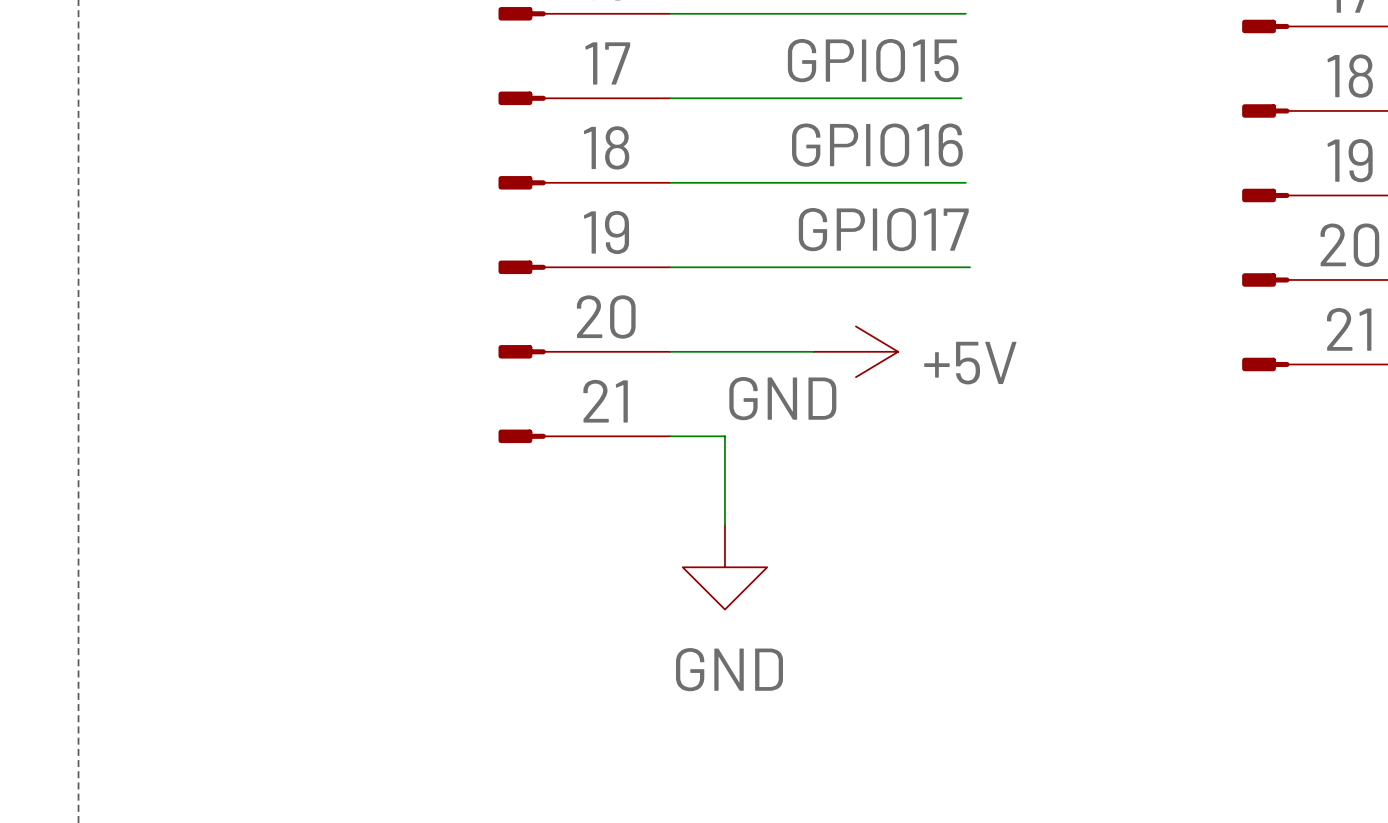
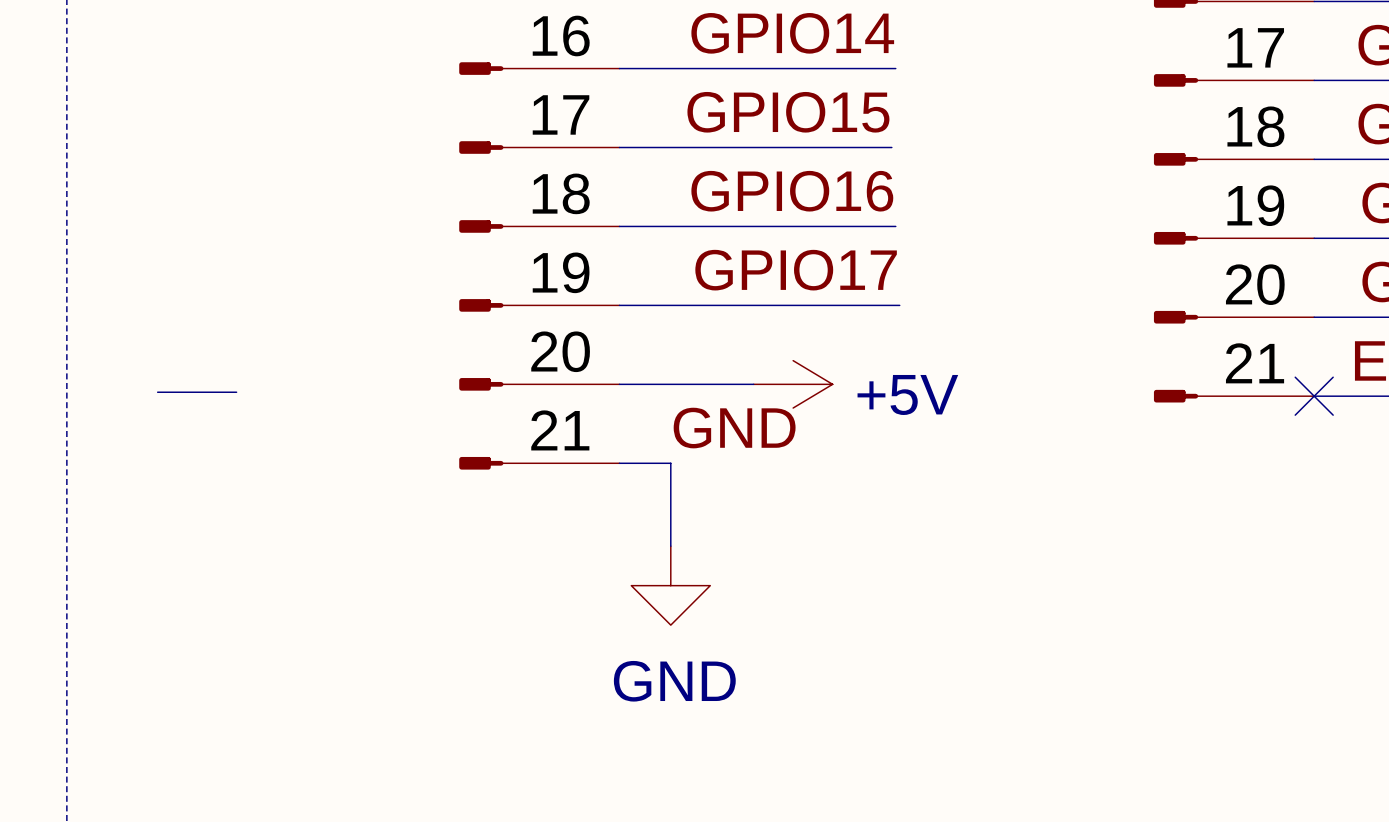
wire: none -> (157, 392) (236, 392)

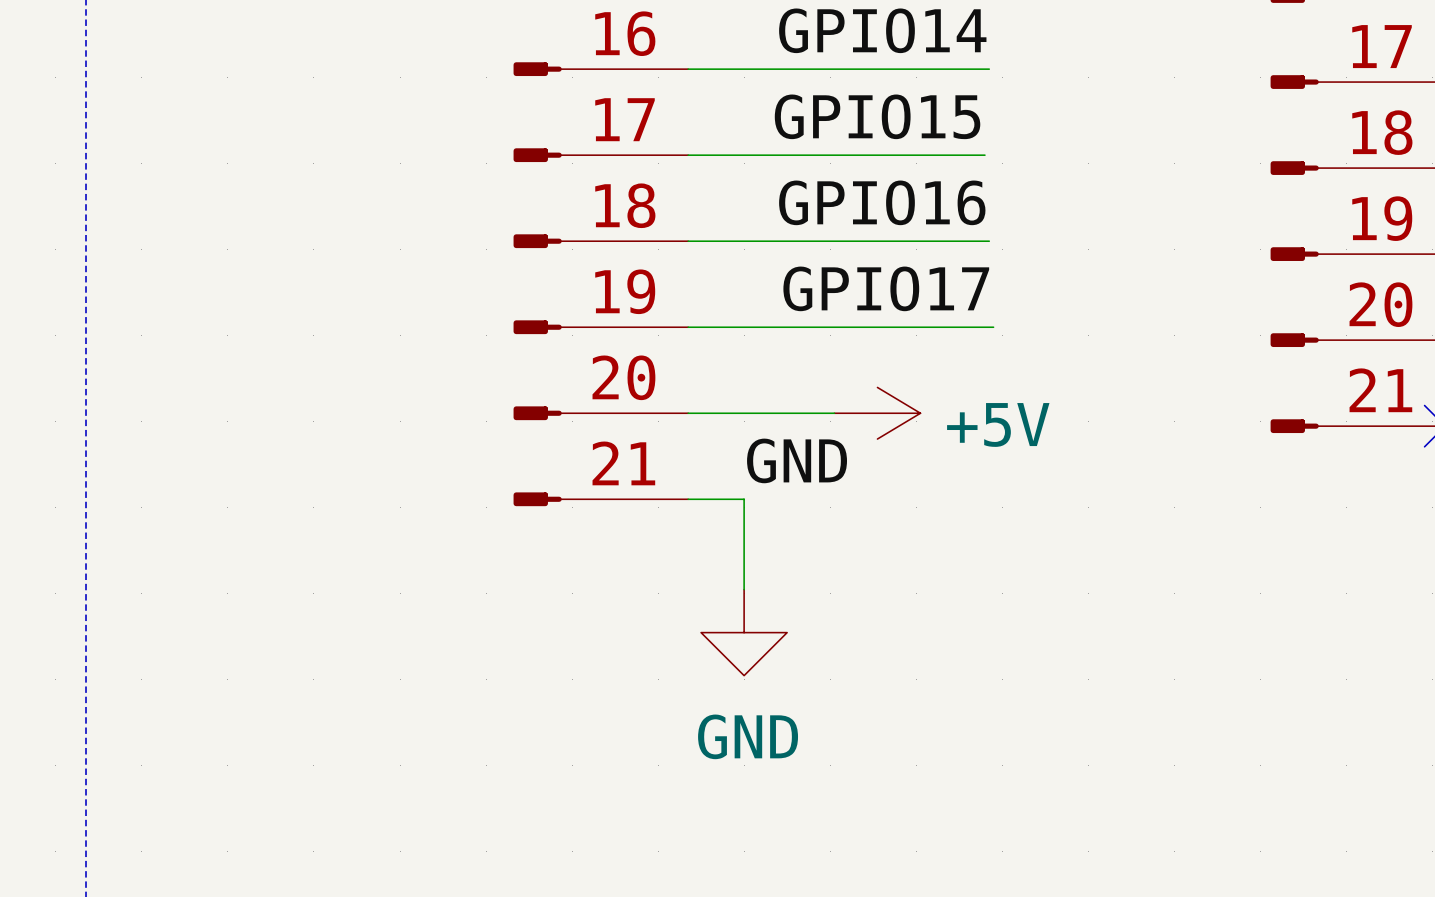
wire: (157, 392) (236, 392) -> none

